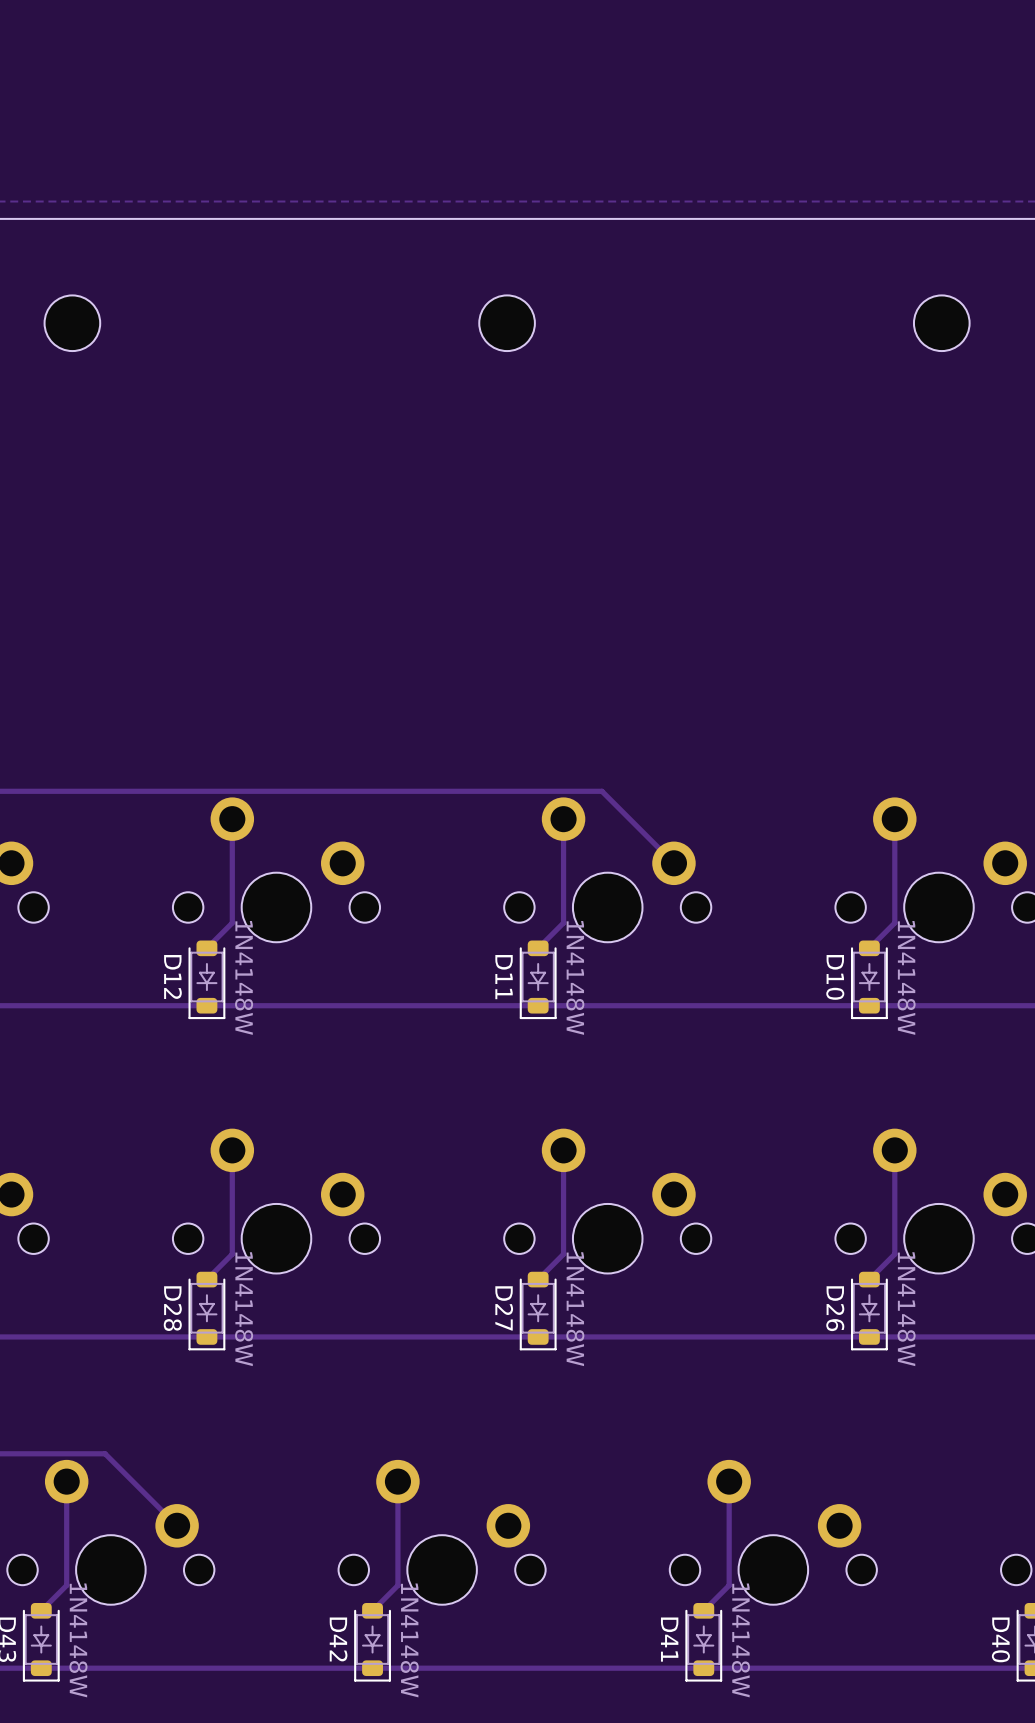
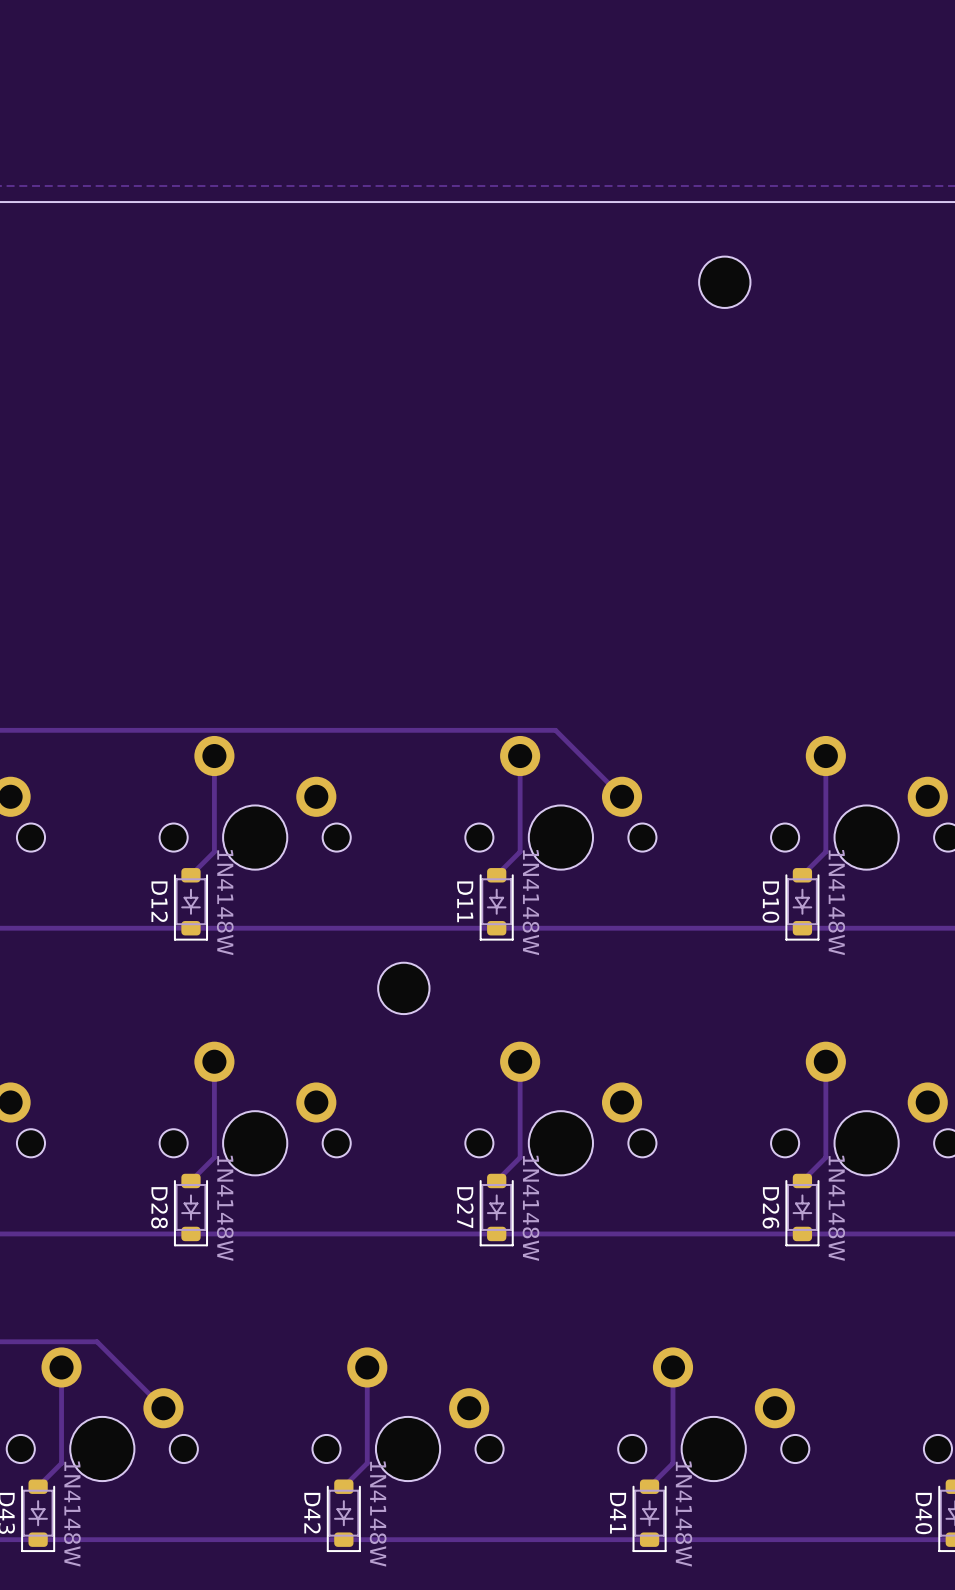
part: none -> (724, 282)
part: (72, 323) -> none
part: (507, 323) -> none
part: (941, 323) -> none
part: none -> (403, 988)

